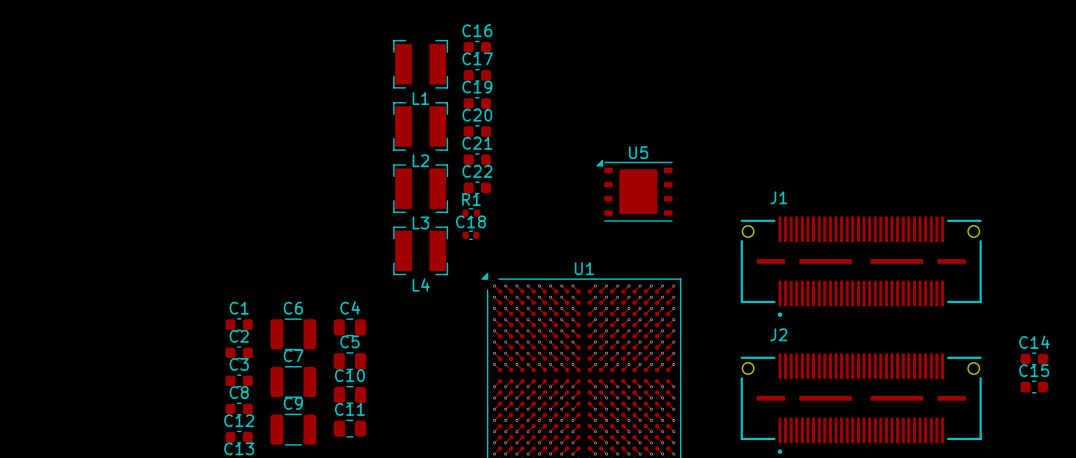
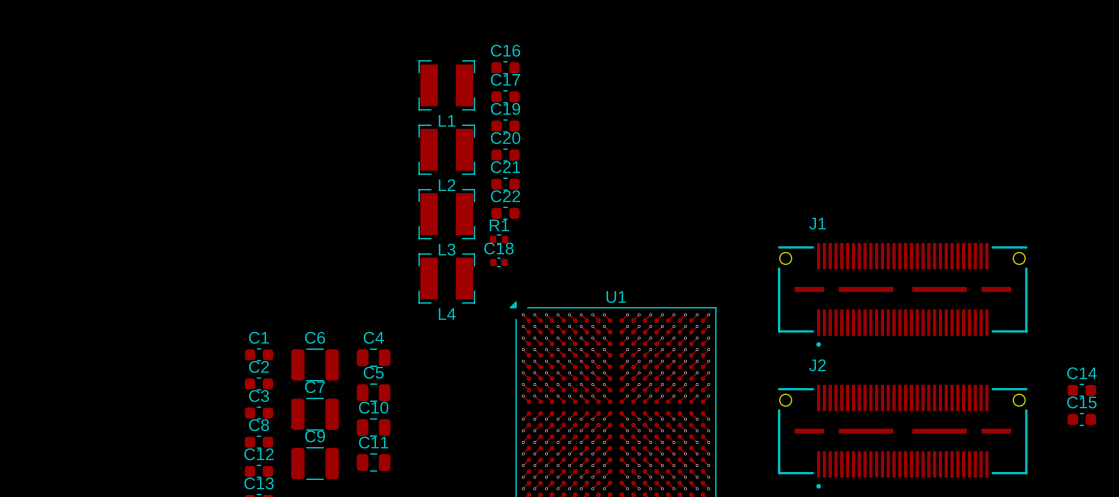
U5: (634, 190) -> none

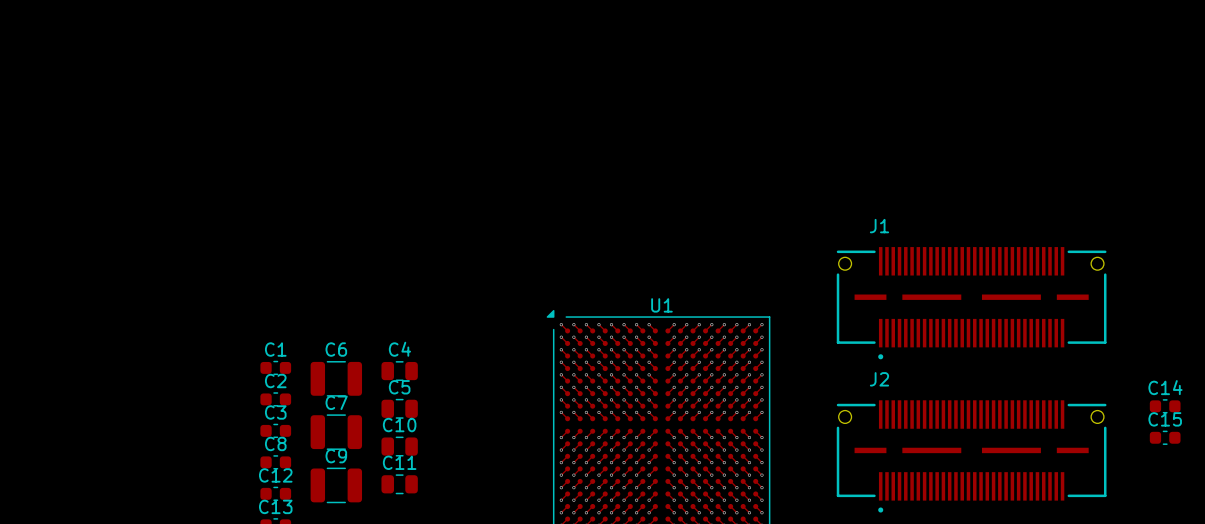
C16: (505, 67) -> none
L1: (446, 85) -> none
C17: (505, 96) -> none
C19: (505, 125) -> none
L2: (446, 149) -> none
C20: (505, 155) -> none
C21: (505, 184) -> none
C22: (505, 213) -> none
L3: (446, 214) -> none
R1: (499, 239) -> none
C18: (498, 262) -> none
L4: (446, 278) -> none

